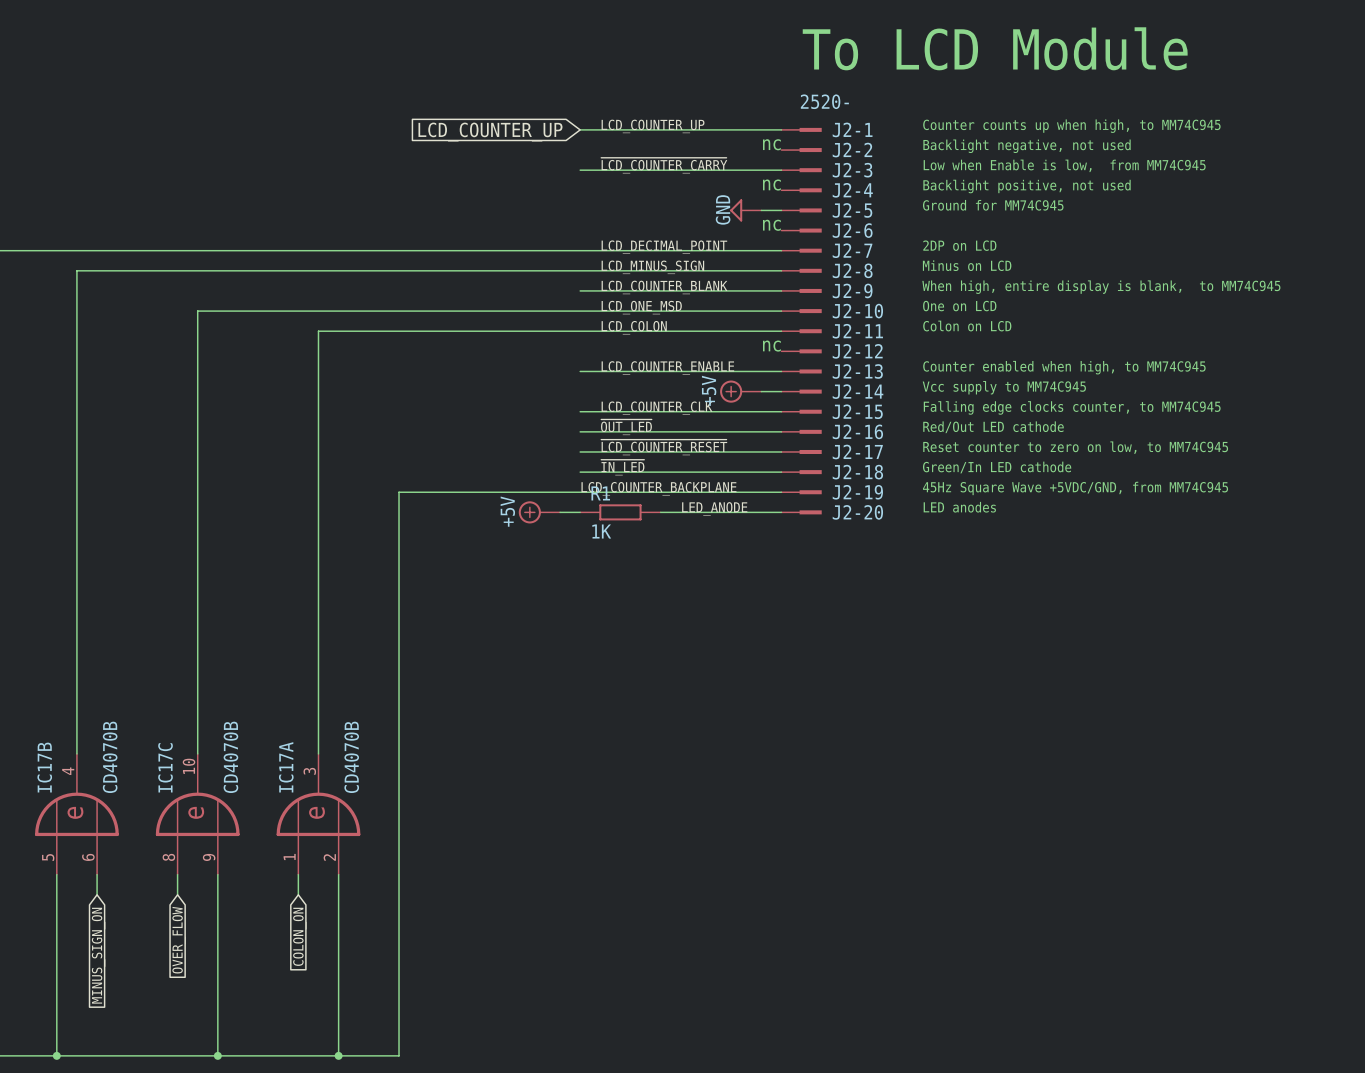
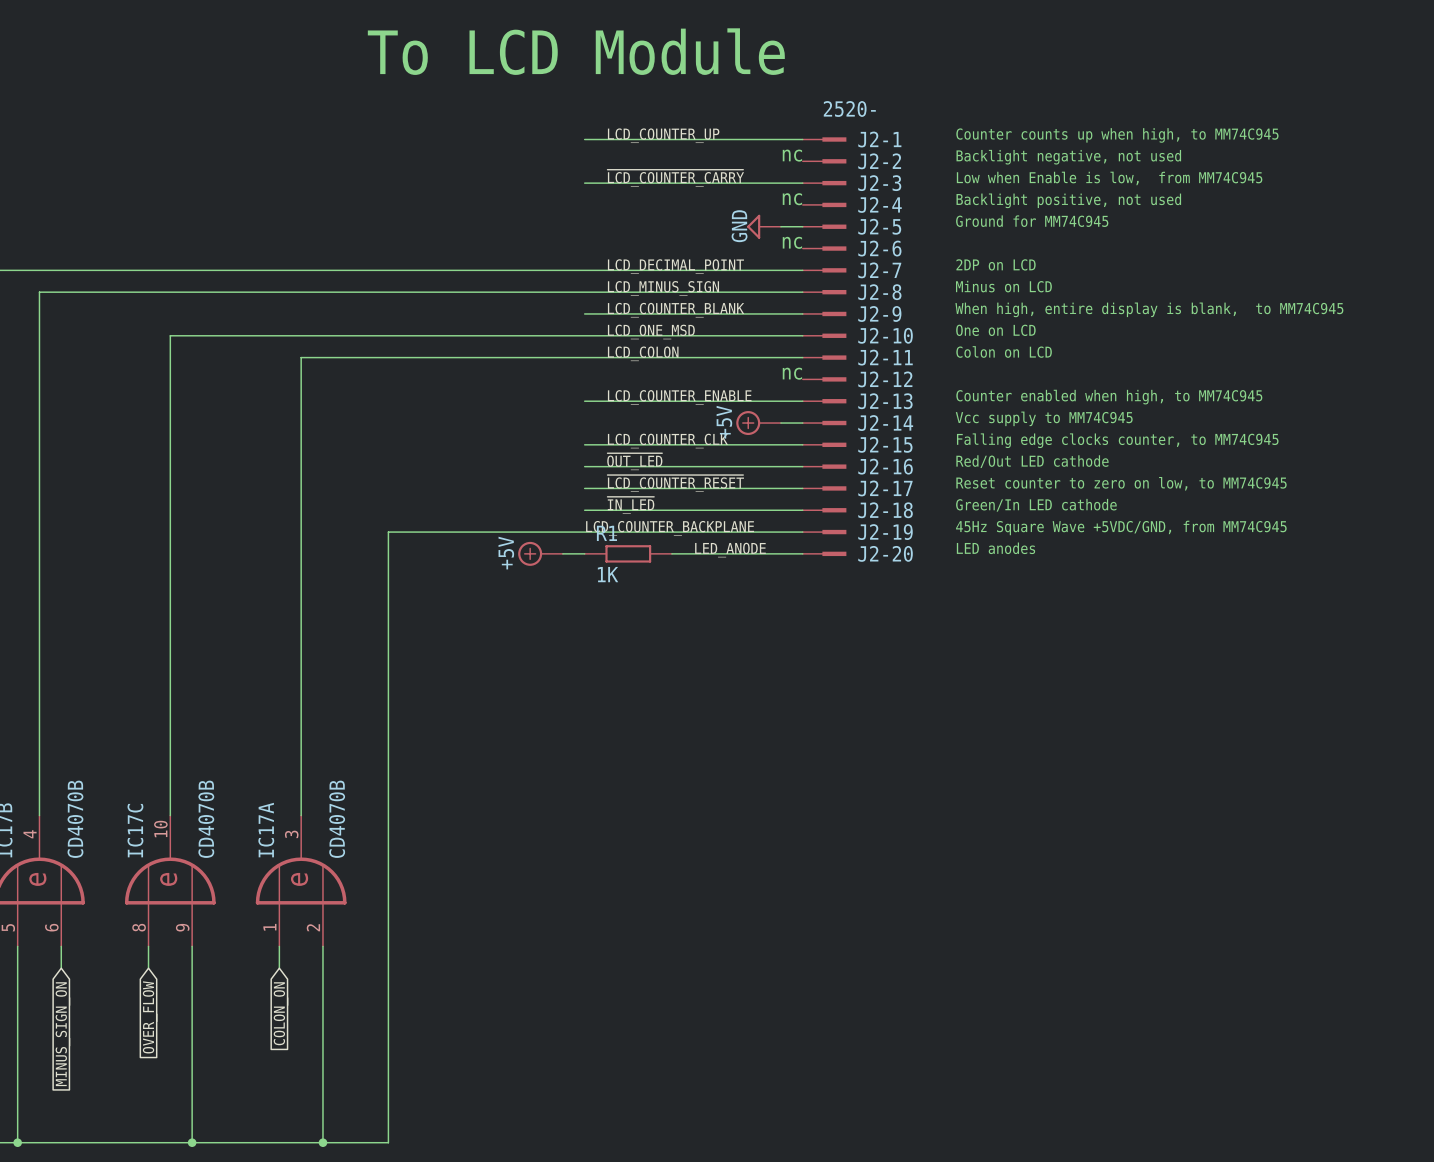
text: none -> To LCD Module (576, 51)
text: To LCD Module (995, 48) -> none
global label: LCD_COUNTER_UP (490, 132) -> none

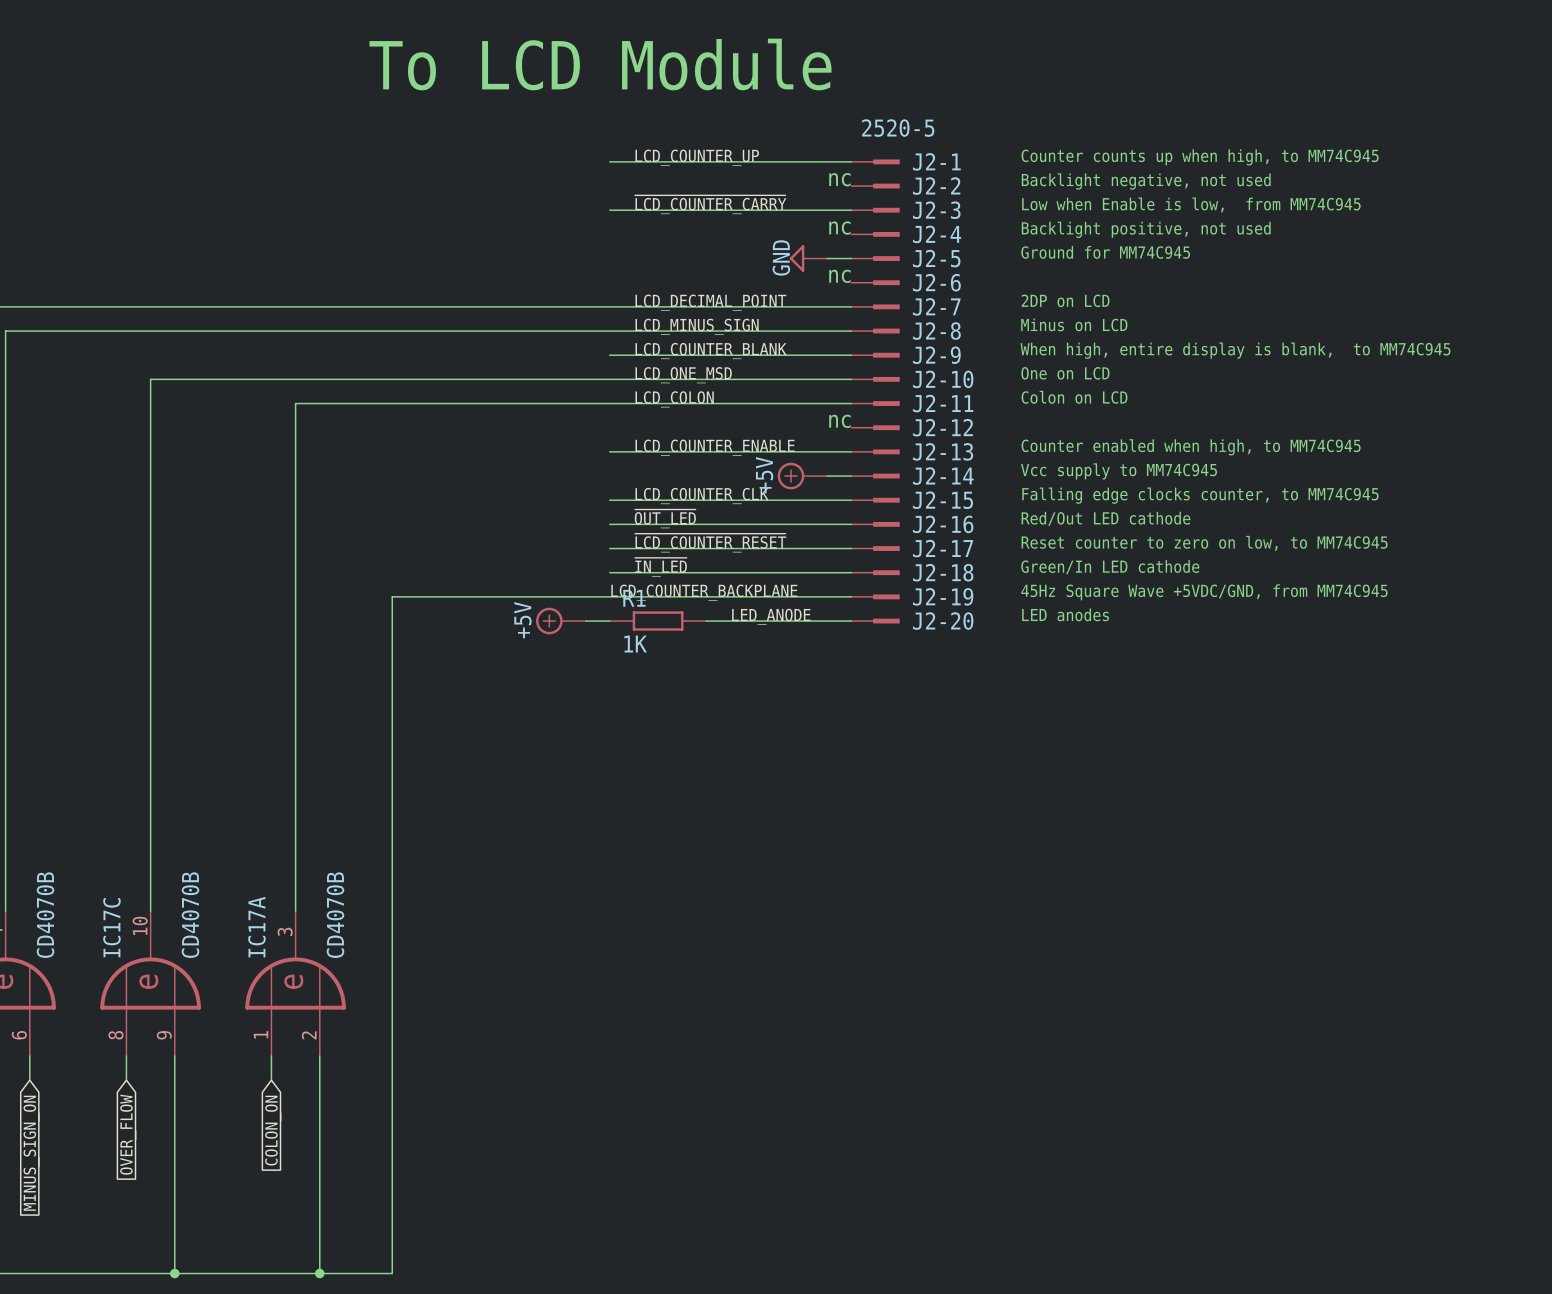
J2-1 value: 2520- (849, 108) -> 2520-5 (898, 128)

